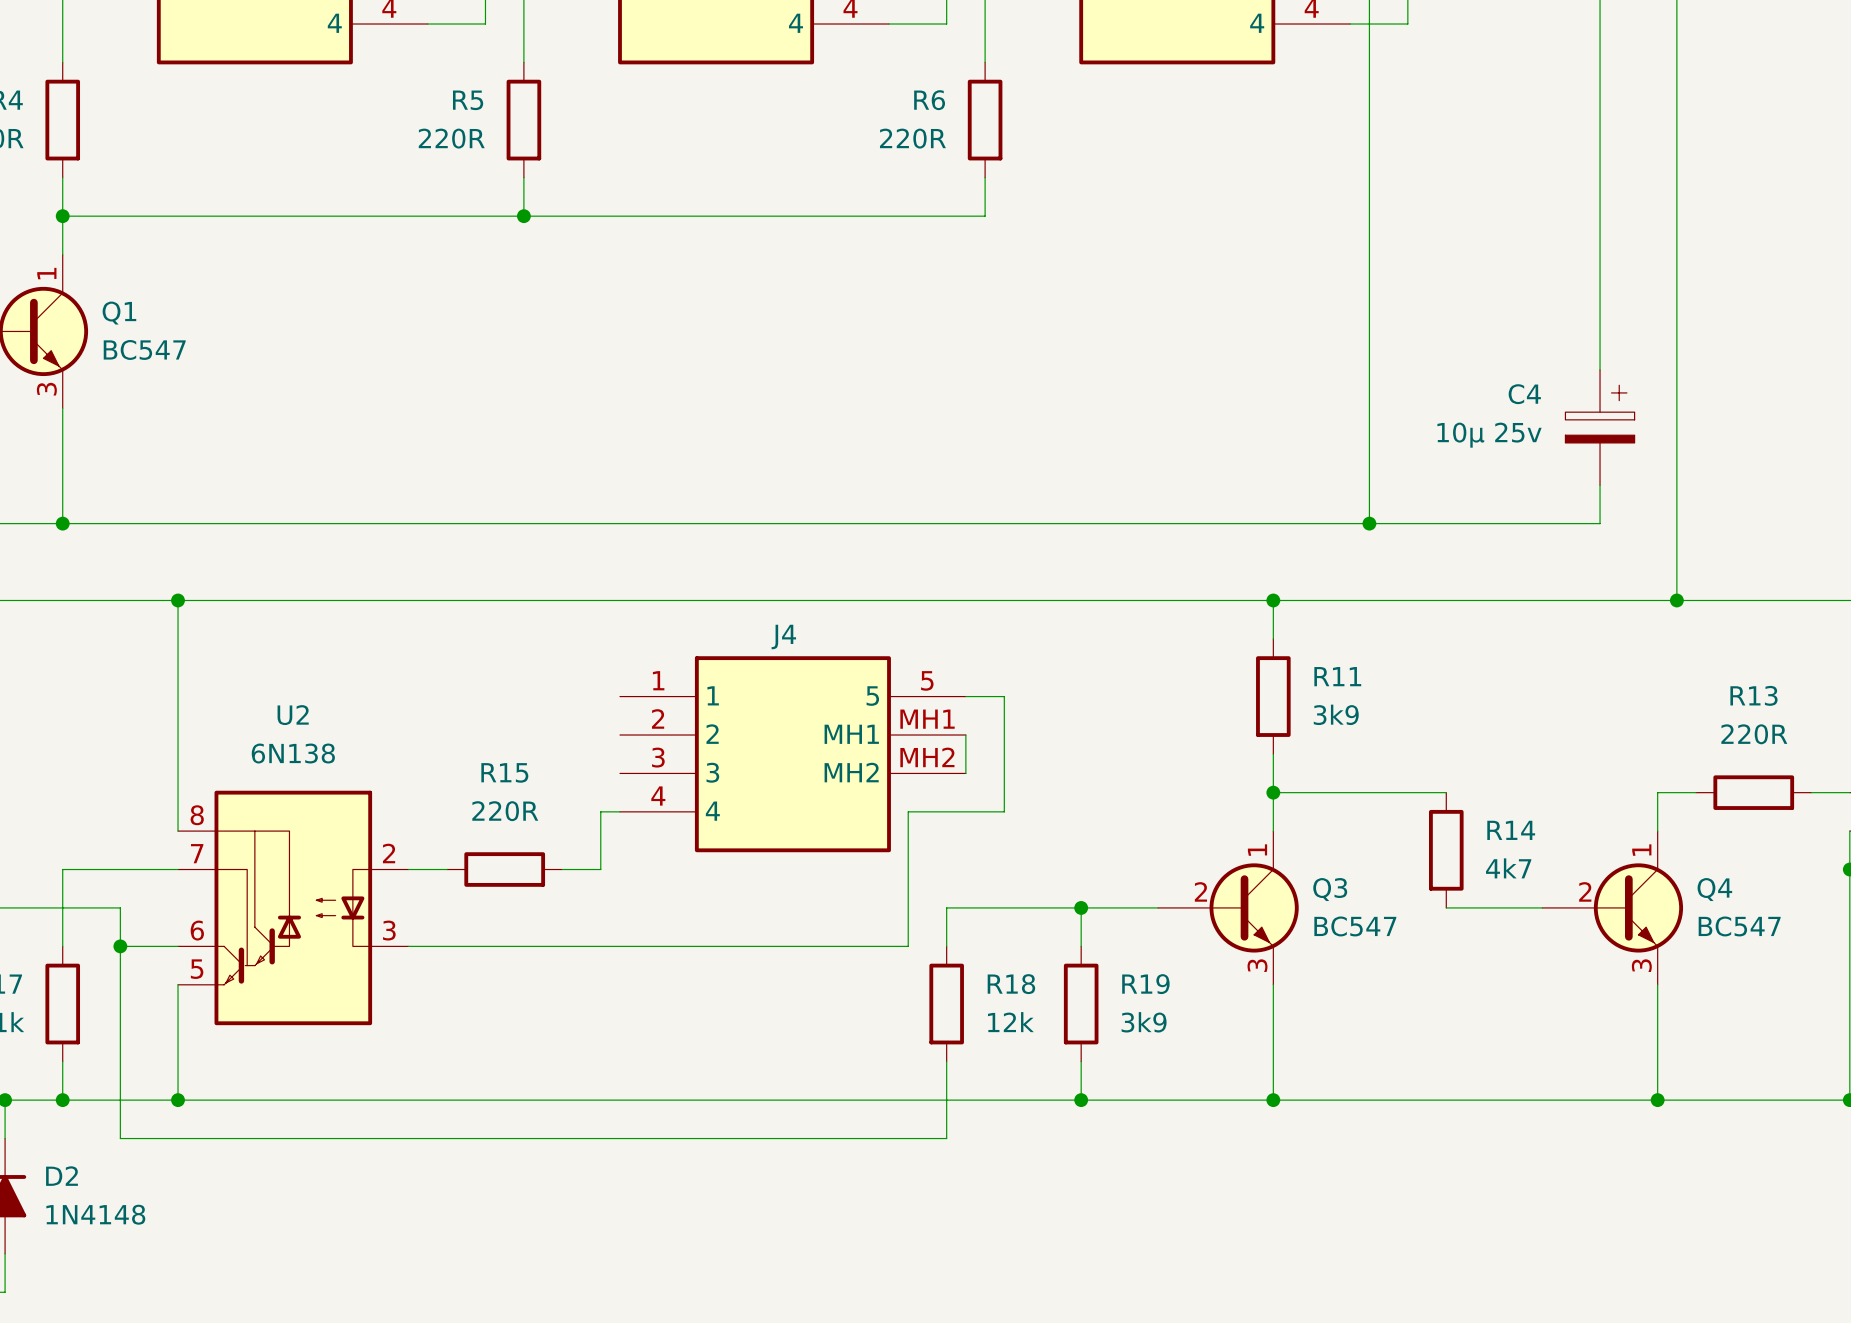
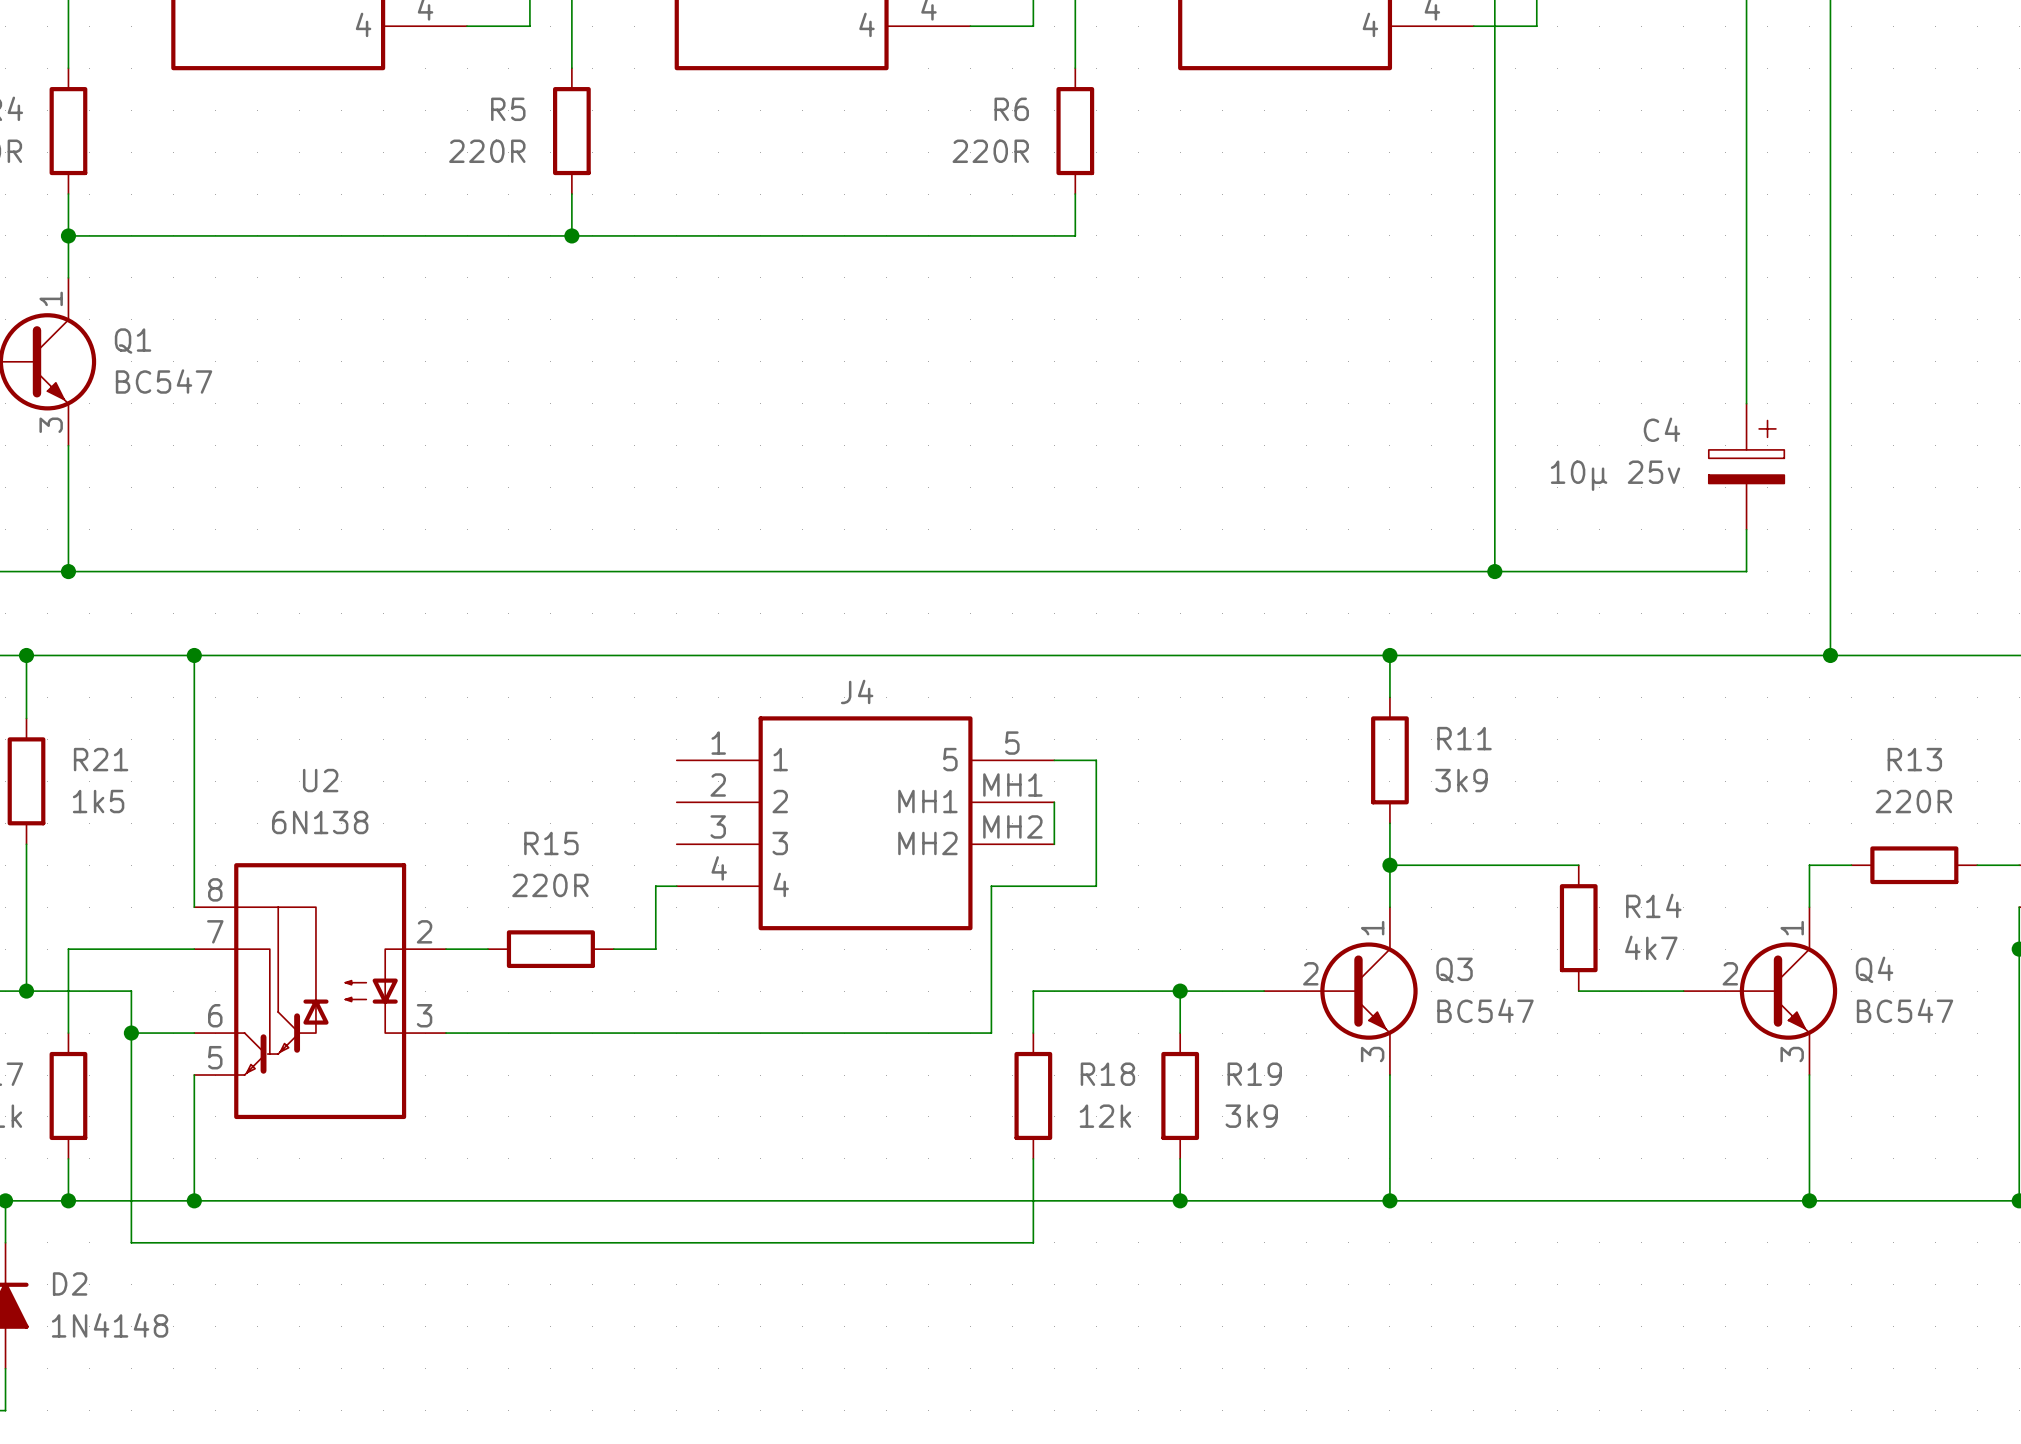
wire: none -> (26, 655) (26, 718)
junction: none -> (26, 655)
R21: none -> 1k5 (26, 781)
wire: none -> (26, 844) (26, 991)
junction: none -> (26, 991)

